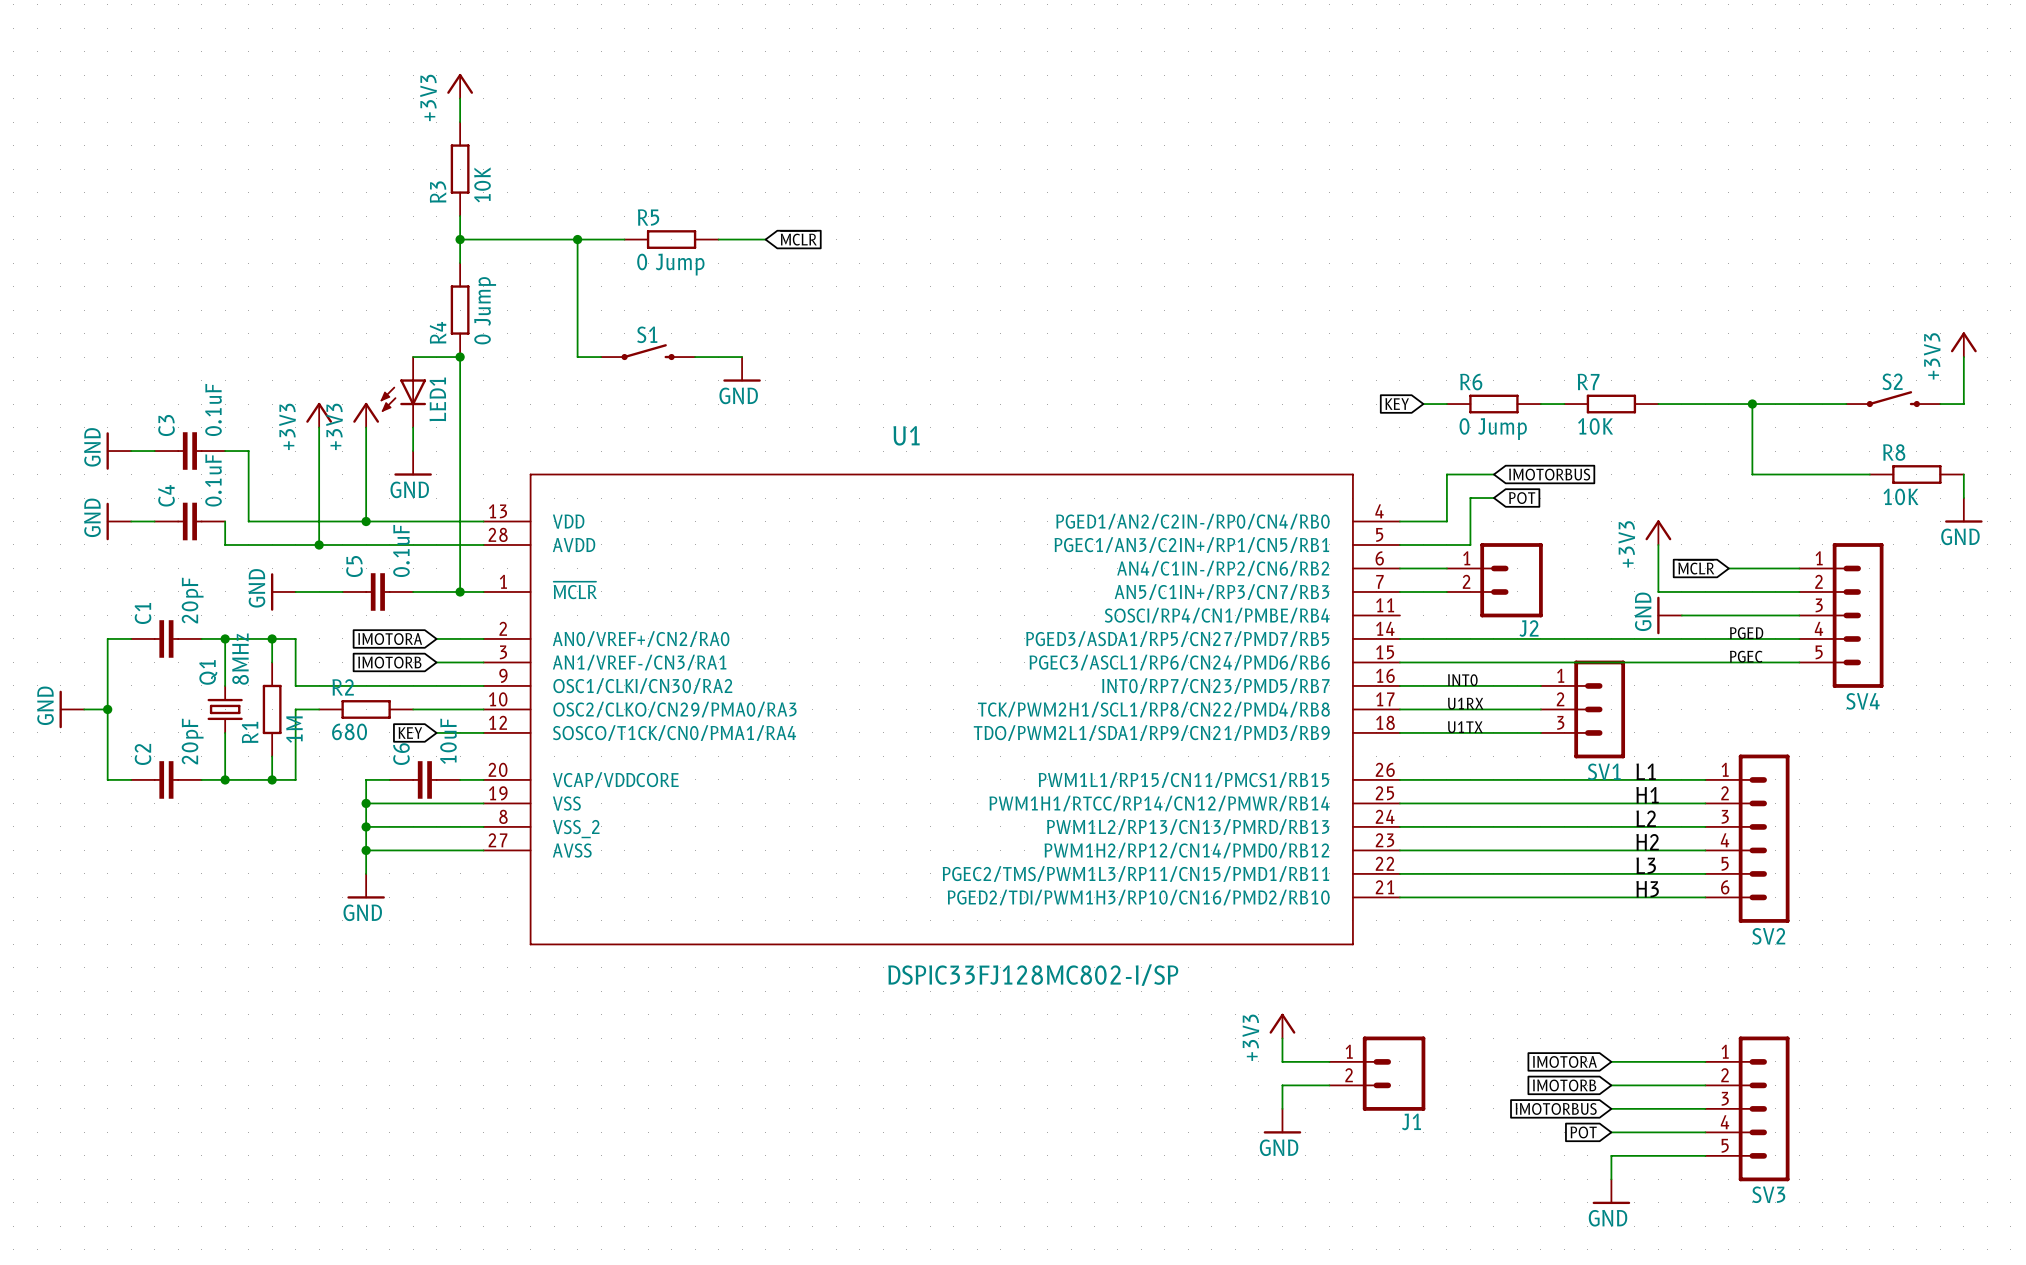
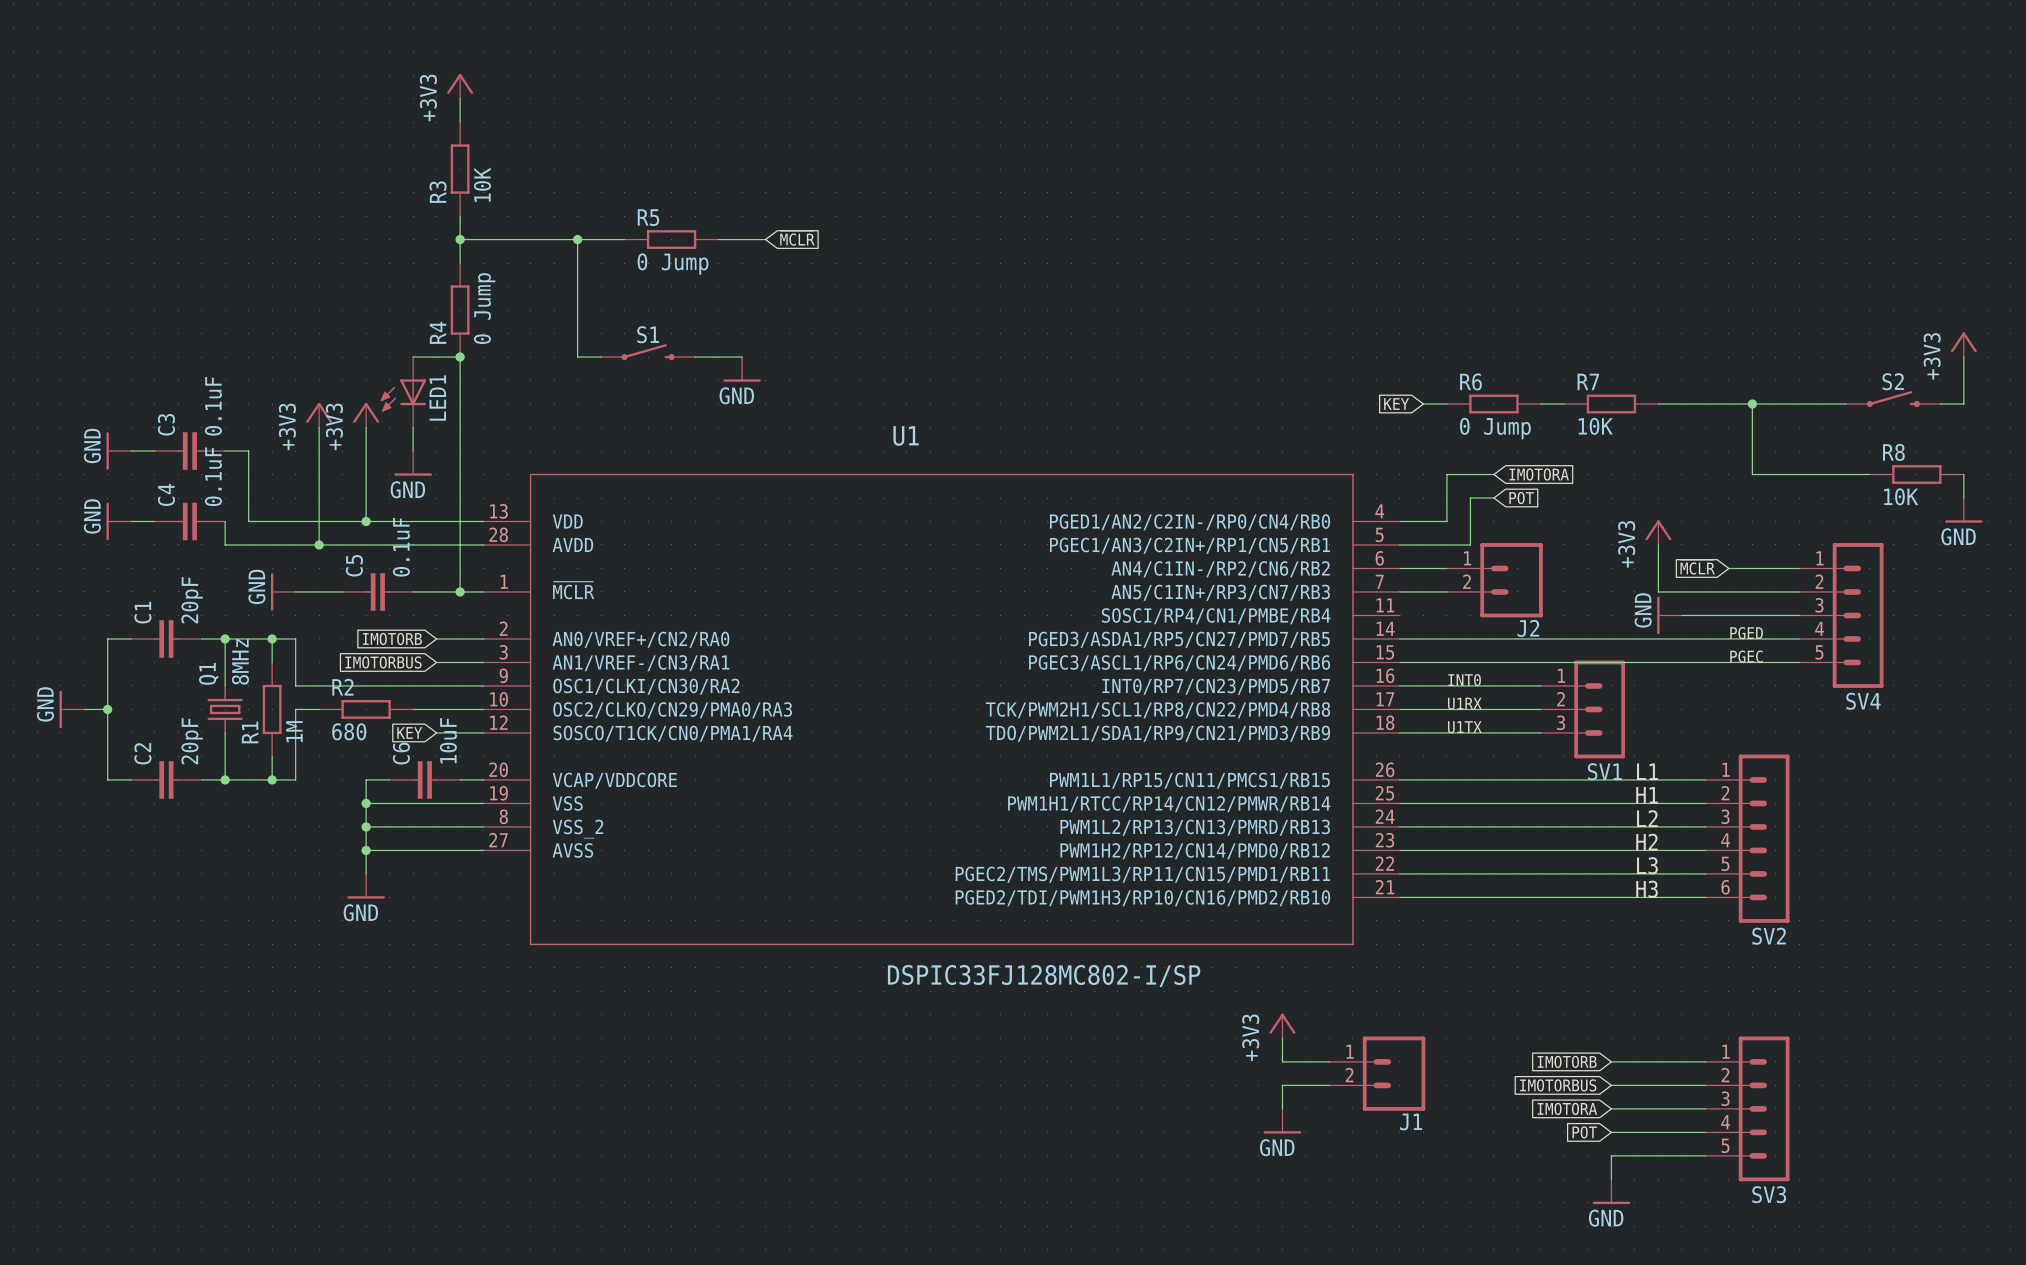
global label: IMOTORBUS (1549, 474) -> IMOTORA (1539, 474)
global label: IMOTORA (390, 639) -> IMOTORB (392, 638)
global label: IMOTORB (389, 662) -> IMOTORBUS (383, 662)
global label: IMOTORA (1564, 1061) -> IMOTORB (1567, 1061)
global label: IMOTORB (1564, 1085) -> IMOTORBUS (1558, 1085)
global label: IMOTORBUS (1556, 1108) -> IMOTORA (1567, 1108)

